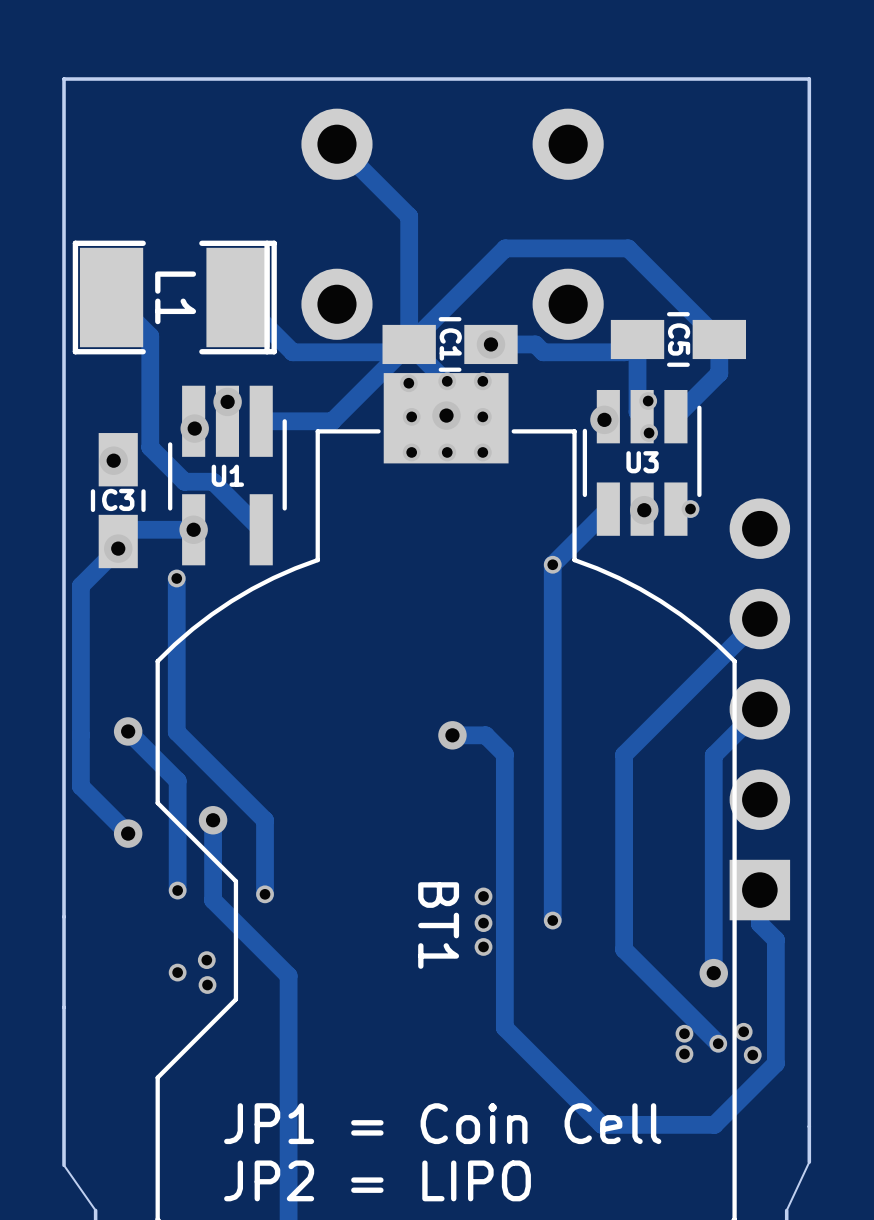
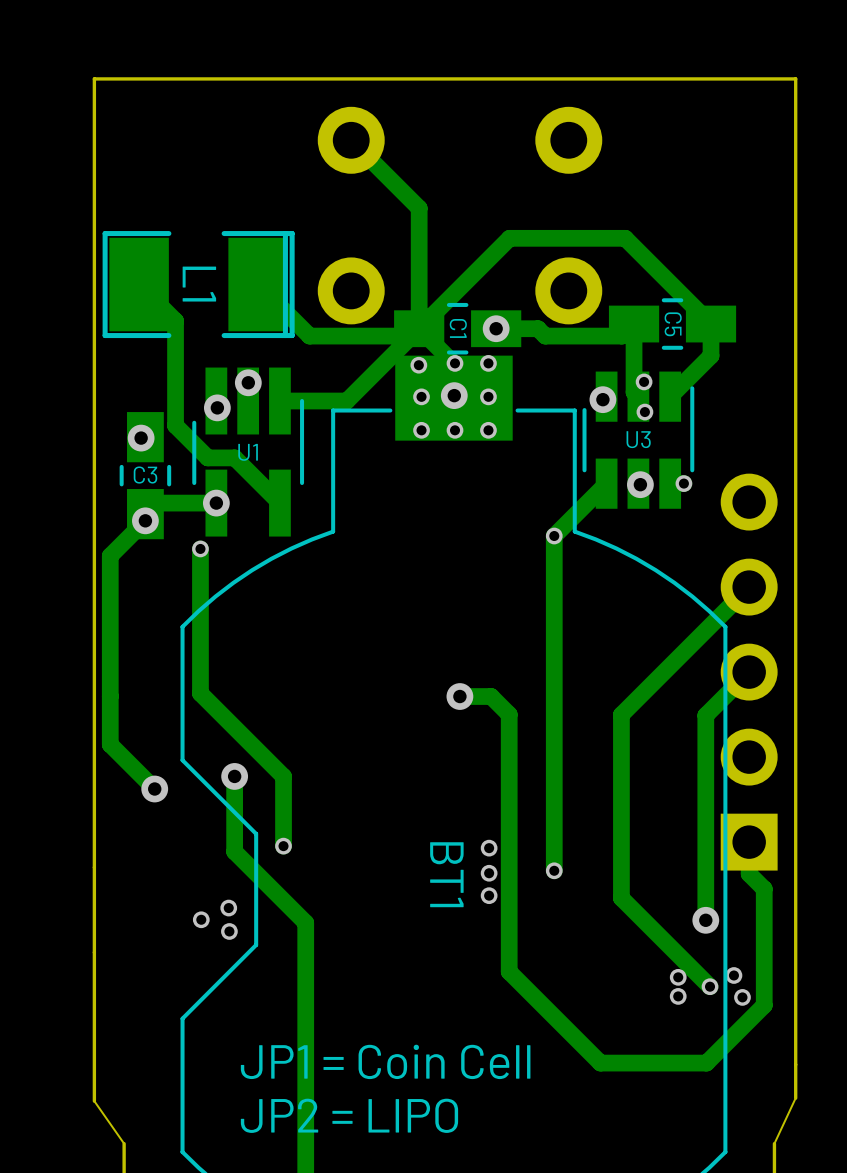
track: (128, 731) (177, 780) (177, 890) -> none
via: (128, 731) -> none
via: (177, 890) -> none

